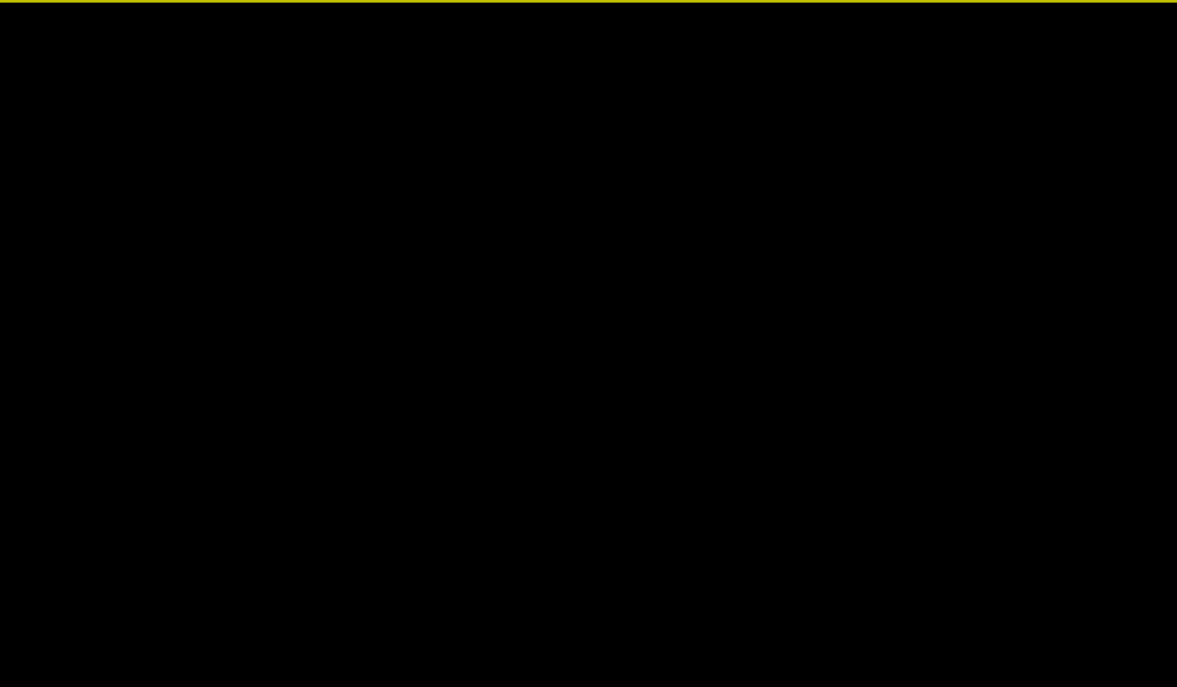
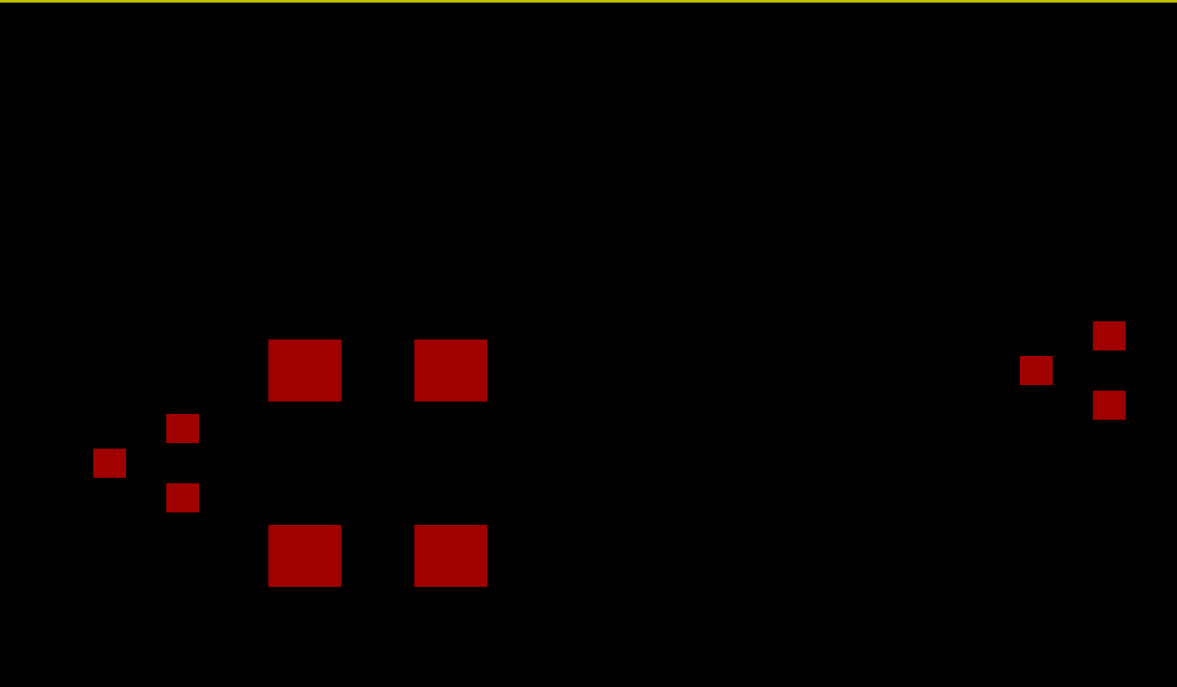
part: none -> (377, 370)
part: none -> (1072, 370)
part: none -> (146, 463)
part: none -> (377, 555)

